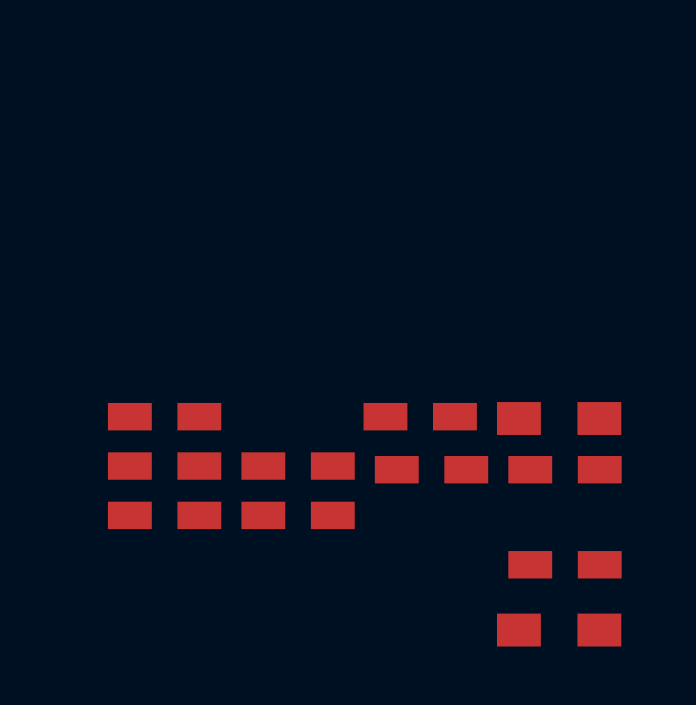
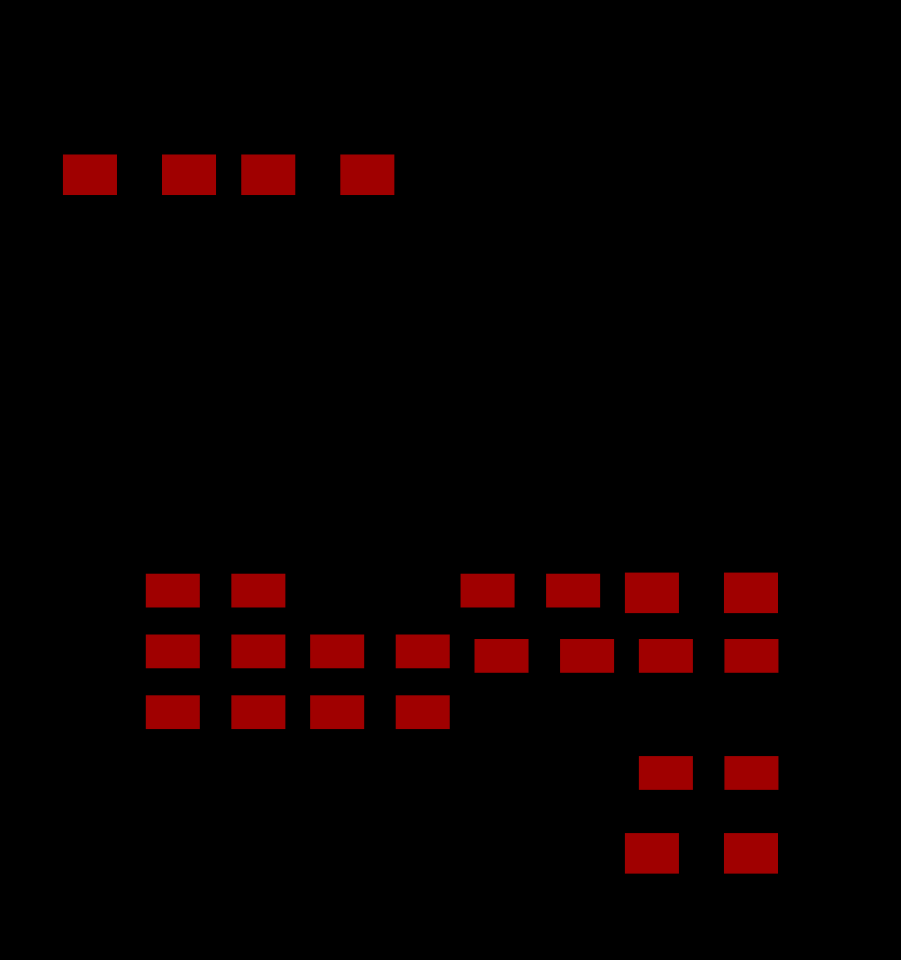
part: none -> (139, 174)
part: none -> (317, 174)

